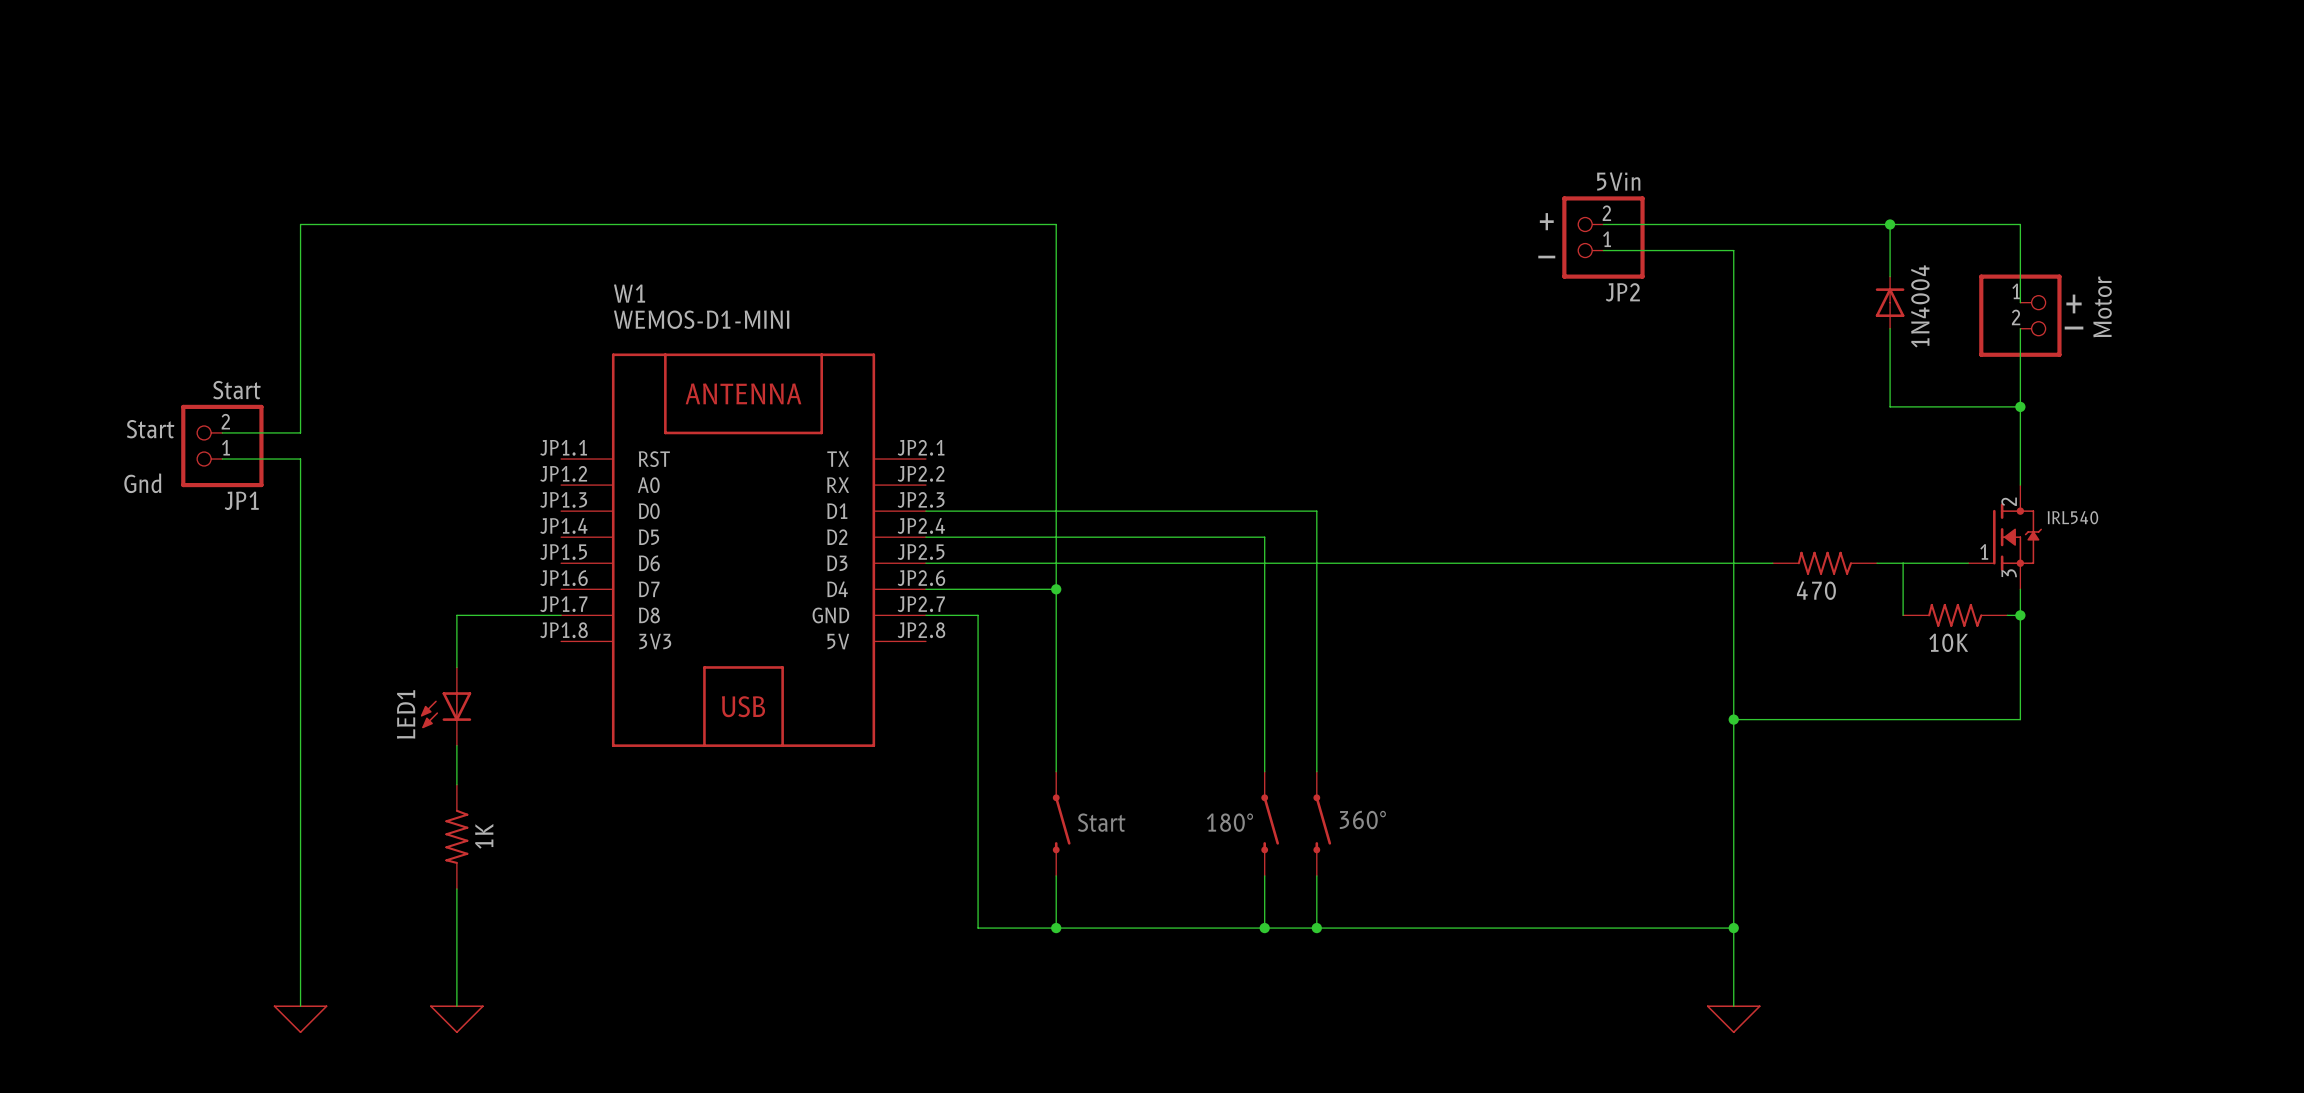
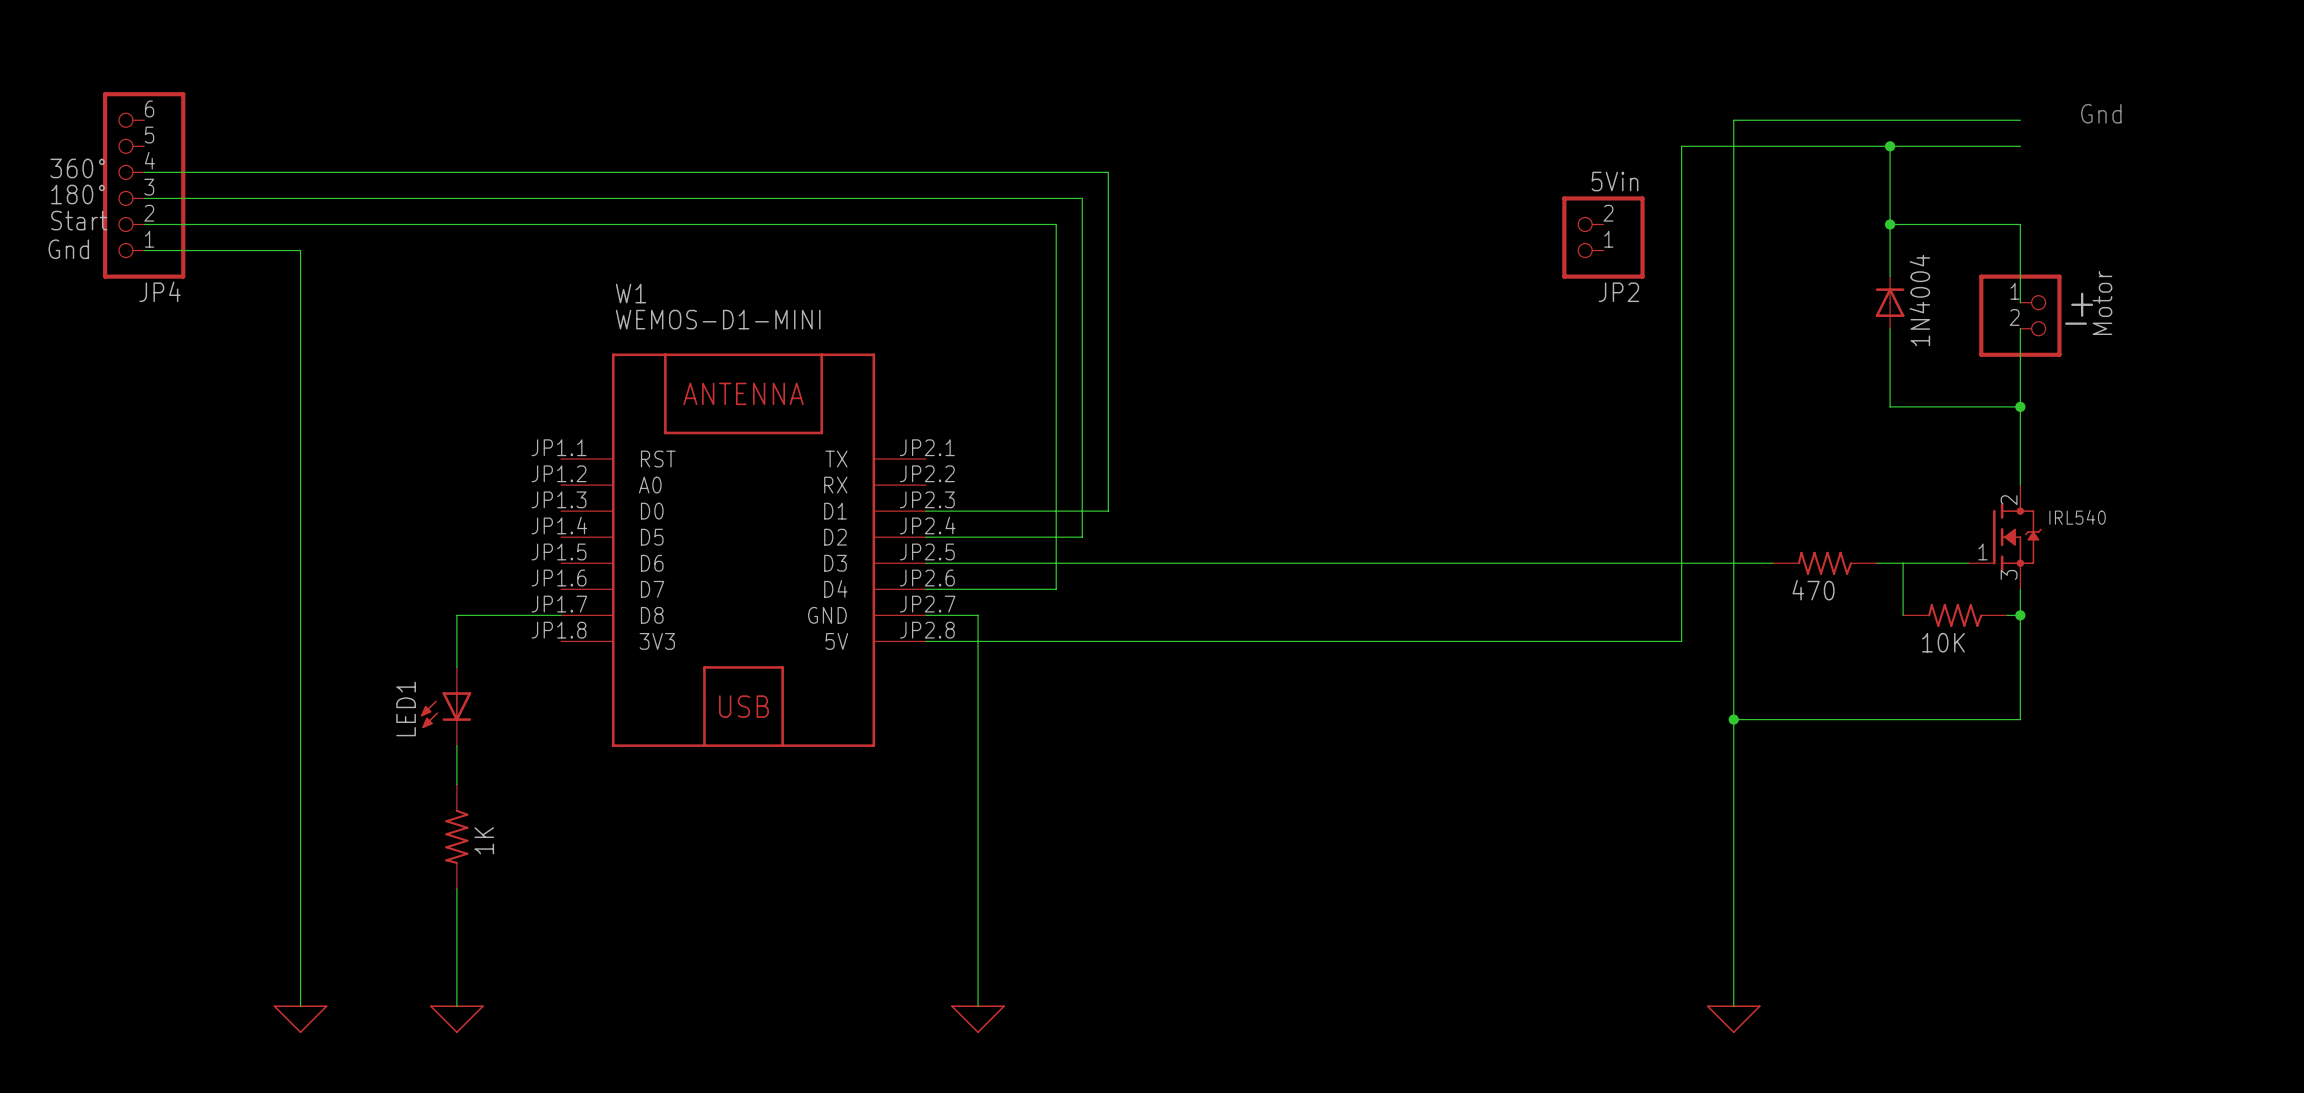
text: none -> Gnd (2101, 113)
junction: none -> (1890, 146)
wire: none -> (2020, 146) (1681, 146) (1681, 641) (925, 641)
text: none -> 360° (77, 168)
JP4: none -> (144, 185)
text: none -> 180° (78, 194)
text: + (1546, 221) -> none
wire: (300, 224) (300, 250) -> (300, 224) (144, 224)
wire: (1603, 224) (1890, 224) -> (1890, 146) (1890, 224)
wire: none -> (144, 250) (300, 250)
wire: (1603, 250) (1733, 250) -> (2020, 120) (1733, 120) (1733, 250)
text: _ (1546, 257) -> none
text position: Start (150, 429) -> Start (79, 220)
wire: (222, 432) (300, 432) -> (300, 459) (300, 432)
JP1: Start (222, 445) -> none
wire: (222, 459) (300, 459) -> none
text position: Gnd (142, 483) -> Gnd (68, 249)
wire: (1108, 511) (1316, 511) (1316, 771) -> (1108, 511) (1108, 172) (144, 172)
wire: (1082, 537) (1264, 537) (1264, 771) -> (1082, 537) (1082, 198) (144, 198)
wire: (1056, 589) (1056, 771) -> none
junction: (1056, 589) -> none
text: 360° (1362, 820) -> none
text: Start (1101, 822) -> none
text: 180° (1229, 822) -> none
part: (1061, 823) -> none
part: (1270, 823) -> none
part: (1322, 823) -> none
wire: (1056, 875) (1056, 928) -> none
wire: (1264, 875) (1264, 928) -> none
wire: (1316, 875) (1316, 928) -> none
wire: (978, 928) (1733, 928) -> (978, 928) (978, 1006)
junction: (1056, 928) -> none
junction: (1264, 928) -> none
junction: (1316, 928) -> none
junction: (1733, 928) -> none
power symbol: none -> (978, 1019)

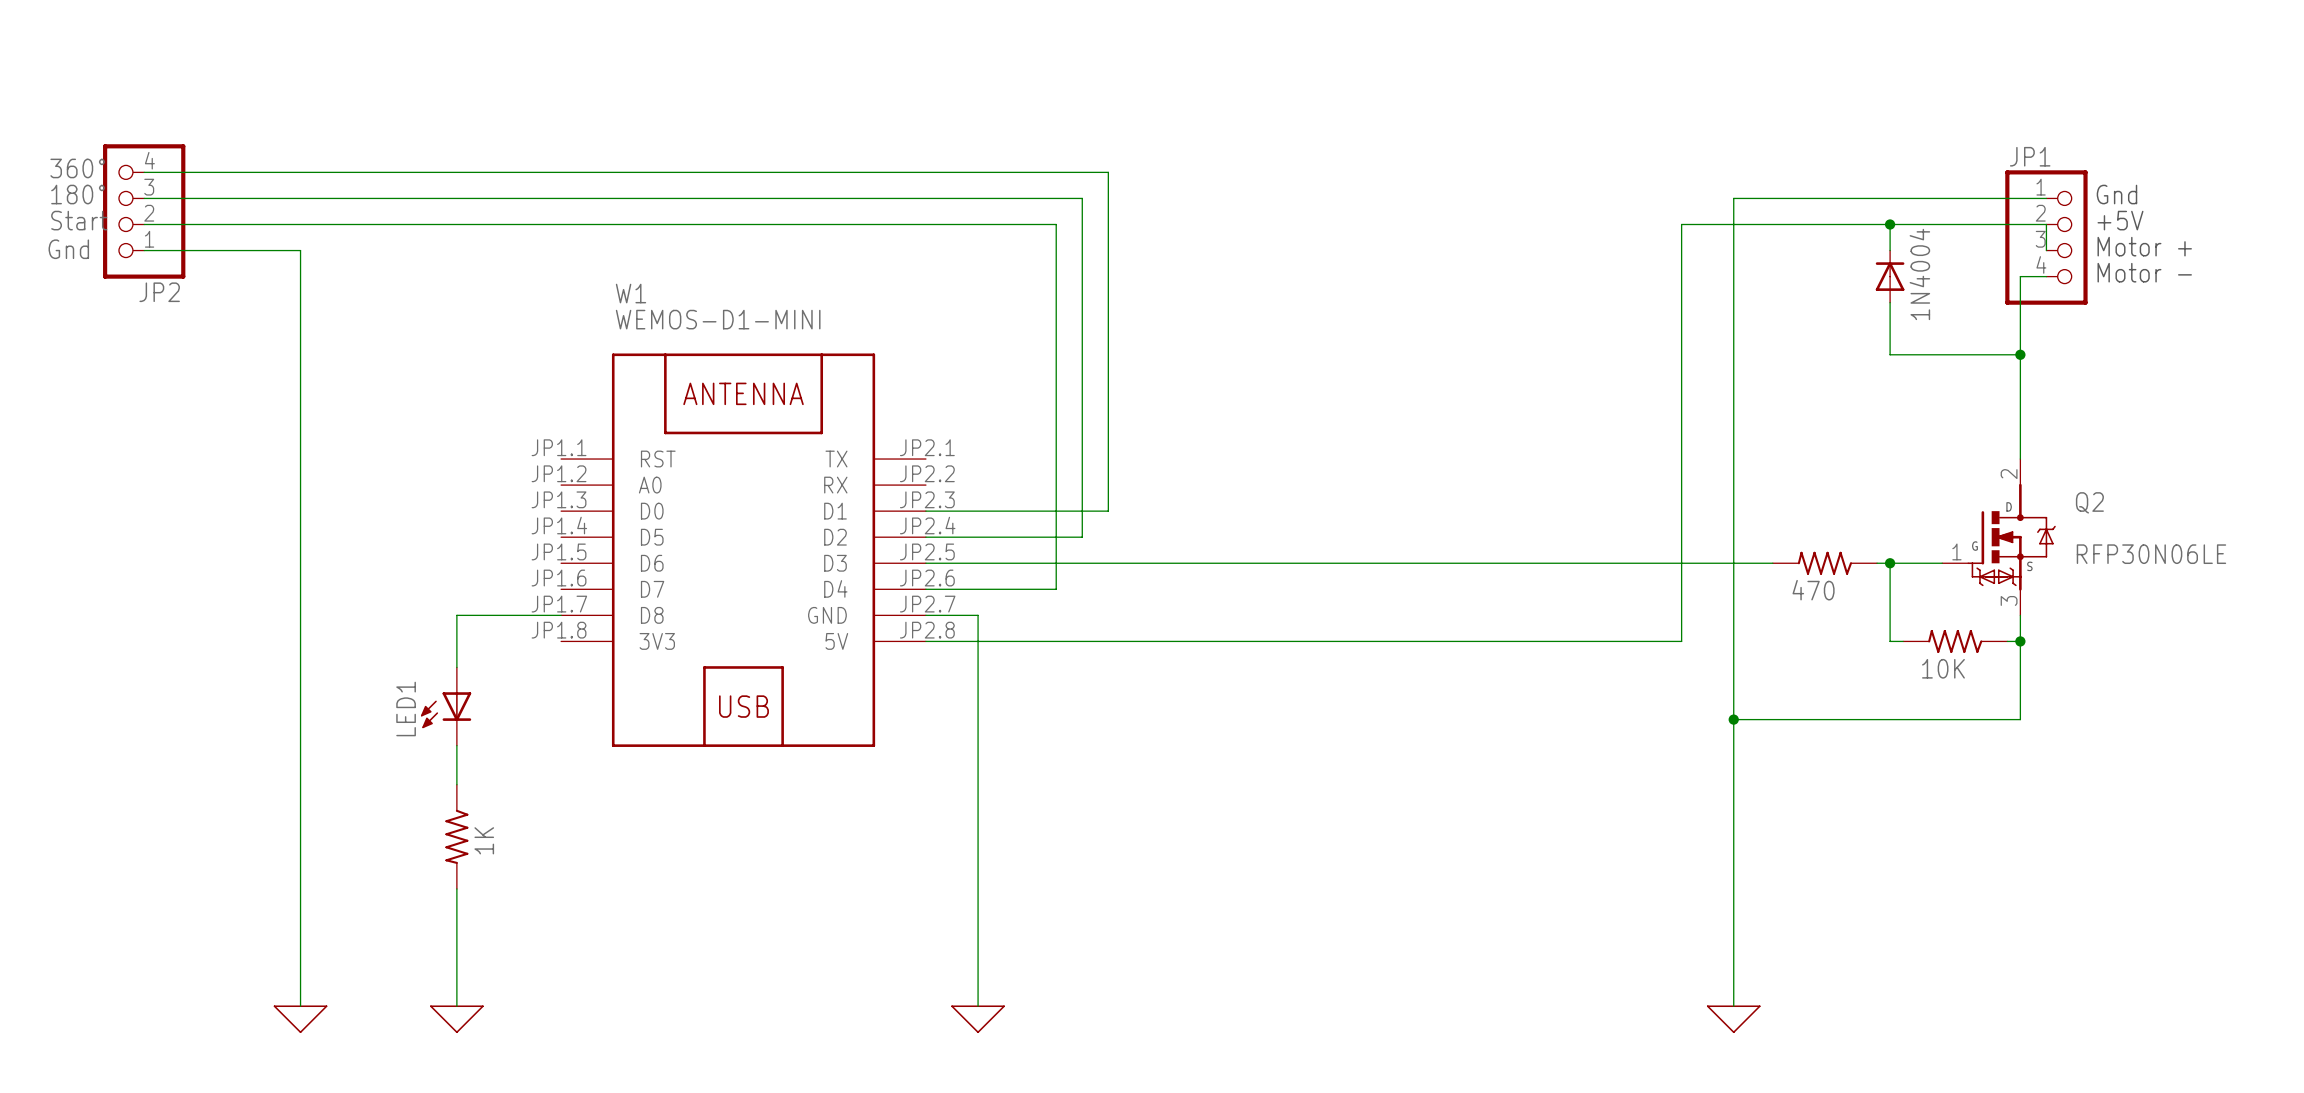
text position: Gnd (2101, 113) -> Gnd (2116, 194)
wire: (2020, 120) (1733, 120) (1733, 198) -> (2046, 198) (1733, 198)
wire: (1890, 146) (1890, 224) -> none
junction: (1890, 146) -> none
wire: (2020, 146) (1681, 146) (1681, 224) -> (1890, 224) (1681, 224)
JP2 value: 5Vin (1614, 181) -> none
JP4: (144, 185) -> none
JP2 symbol: [1562, 196, 1645, 279] -> [103, 144, 186, 279]
text: none -> +5V (2120, 220)
wire: (2020, 224) (2020, 276) -> (2020, 224) (2046, 224) (2046, 250)
JP1: none -> (2046, 237)
text: none -> Motor + (2144, 246)
text: none -> Motor - (2144, 272)
JP2 name position: JP2 (1618, 292) -> JP2 (159, 292)
part position: (1890, 302) -> (1890, 276)
text: + (2082, 304) -> none
part: Motor (2020, 315) -> none
text: _ (2076, 323) -> none
wire: (1890, 354) (1890, 406) (2020, 406) -> (1890, 354) (2020, 354)
junction position: (2020, 406) -> (2020, 354)
Q2: none -> RFP30N06LE (1999, 537)
part: IRL540 (2005, 537) -> none
wire: none -> (1890, 563) (1890, 641) (1903, 641)
junction: none -> (1890, 563)
wire: (1903, 563) (1903, 615) -> none
part position: (1955, 615) -> (1955, 641)
junction position: (2020, 615) -> (2020, 641)
wire: none -> (2007, 641) (2020, 641)

